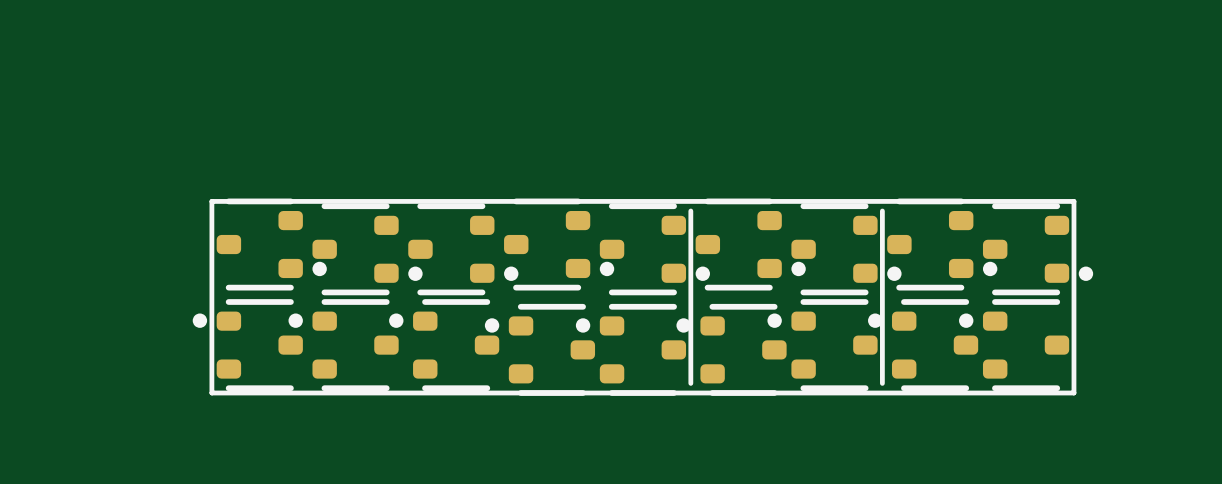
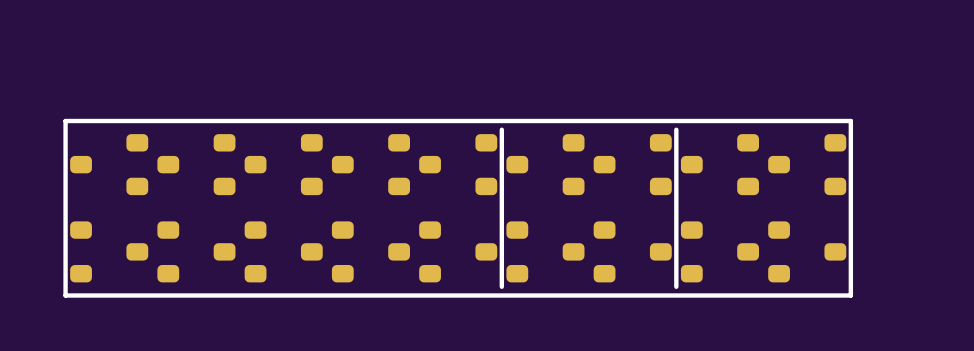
part footprint: [216, 198, 327, 291] -> [70, 134, 149, 196]
part footprint: [504, 198, 615, 291] -> [331, 134, 410, 196]
part footprint: [695, 198, 806, 291] -> [506, 134, 585, 196]
part footprint: [887, 198, 998, 291] -> [680, 134, 760, 196]
part footprint: [312, 203, 423, 296] -> [157, 134, 236, 196]
part footprint: [408, 203, 519, 296] -> [244, 134, 323, 196]
part footprint: [599, 203, 710, 296] -> [419, 134, 498, 196]
part footprint: [791, 203, 902, 296] -> [593, 134, 672, 196]
part footprint: [982, 203, 1094, 296] -> [768, 134, 847, 196]
part footprint: [192, 299, 303, 392] -> [70, 221, 149, 283]
part footprint: [288, 299, 399, 392] -> [157, 221, 236, 283]
part footprint: [389, 299, 500, 392] -> [244, 221, 323, 283]
part footprint: [767, 299, 878, 392] -> [593, 221, 672, 283]
part footprint: [868, 299, 979, 392] -> [680, 221, 760, 283]
part footprint: [959, 299, 1070, 392] -> [768, 221, 847, 283]
part footprint: [484, 303, 596, 396] -> [331, 221, 410, 283]
part footprint: [575, 303, 687, 396] -> [419, 221, 498, 283]
part footprint: [676, 303, 787, 396] -> [506, 221, 585, 283]

